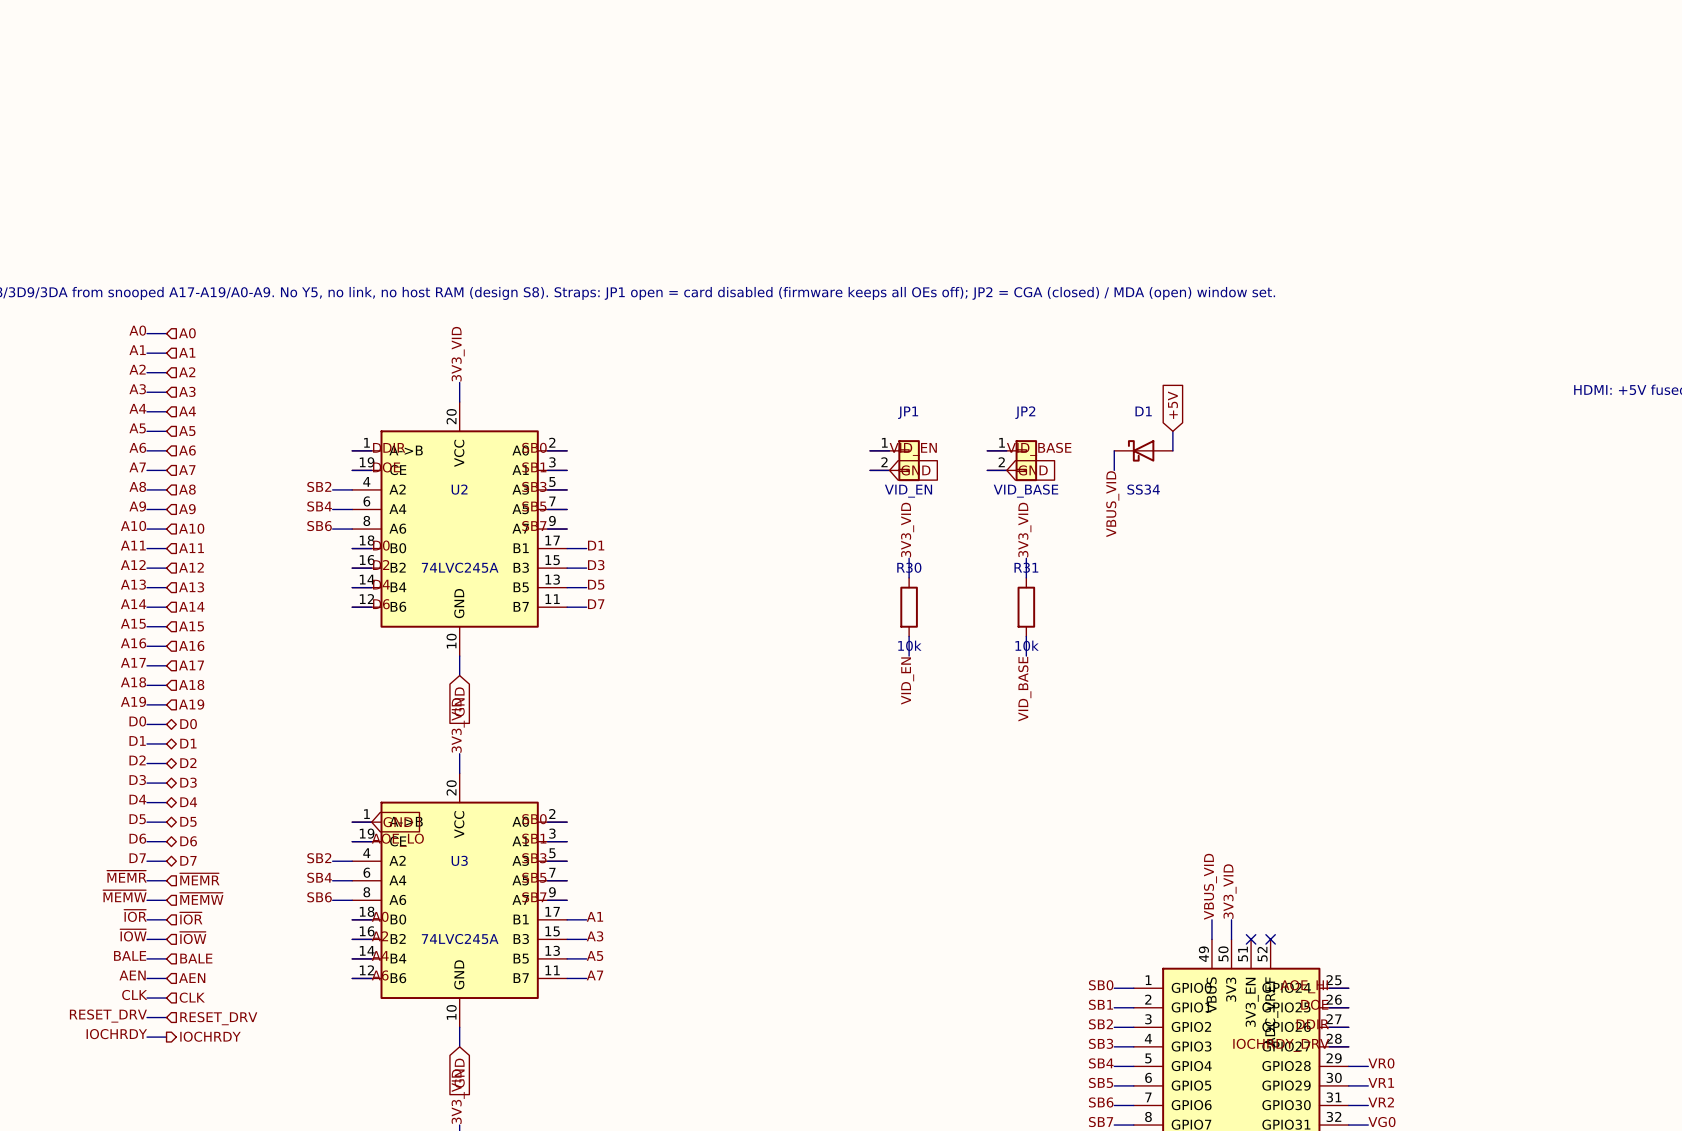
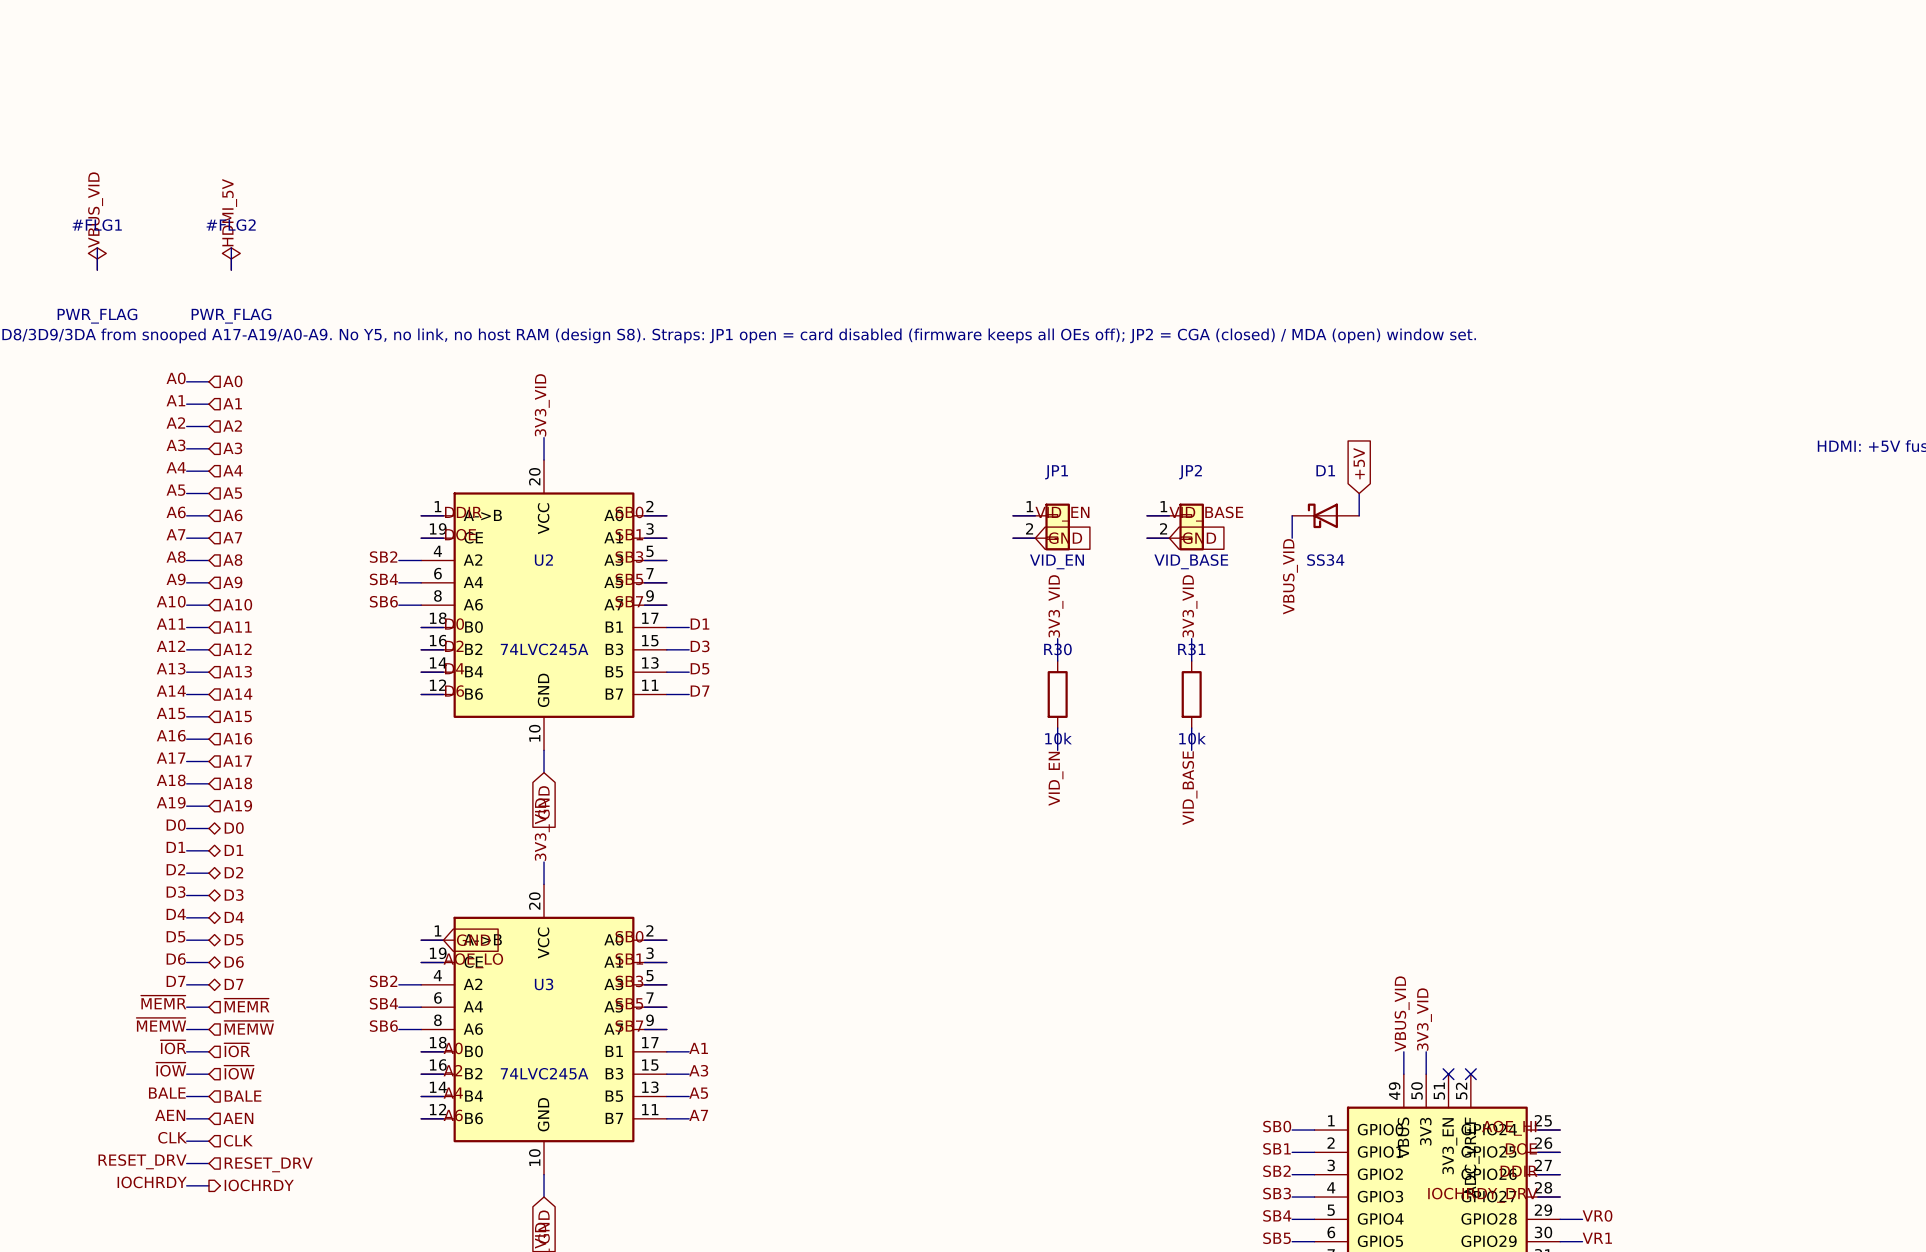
label: none -> VBUS_VID (95, 210)
label: none -> HDMI_5V (229, 212)
wire: none -> (97, 247) (97, 270)
wire: none -> (231, 247) (231, 270)
#FLG1: none -> PWR_FLAG (97, 259)
#FLG2: none -> PWR_FLAG (231, 259)

